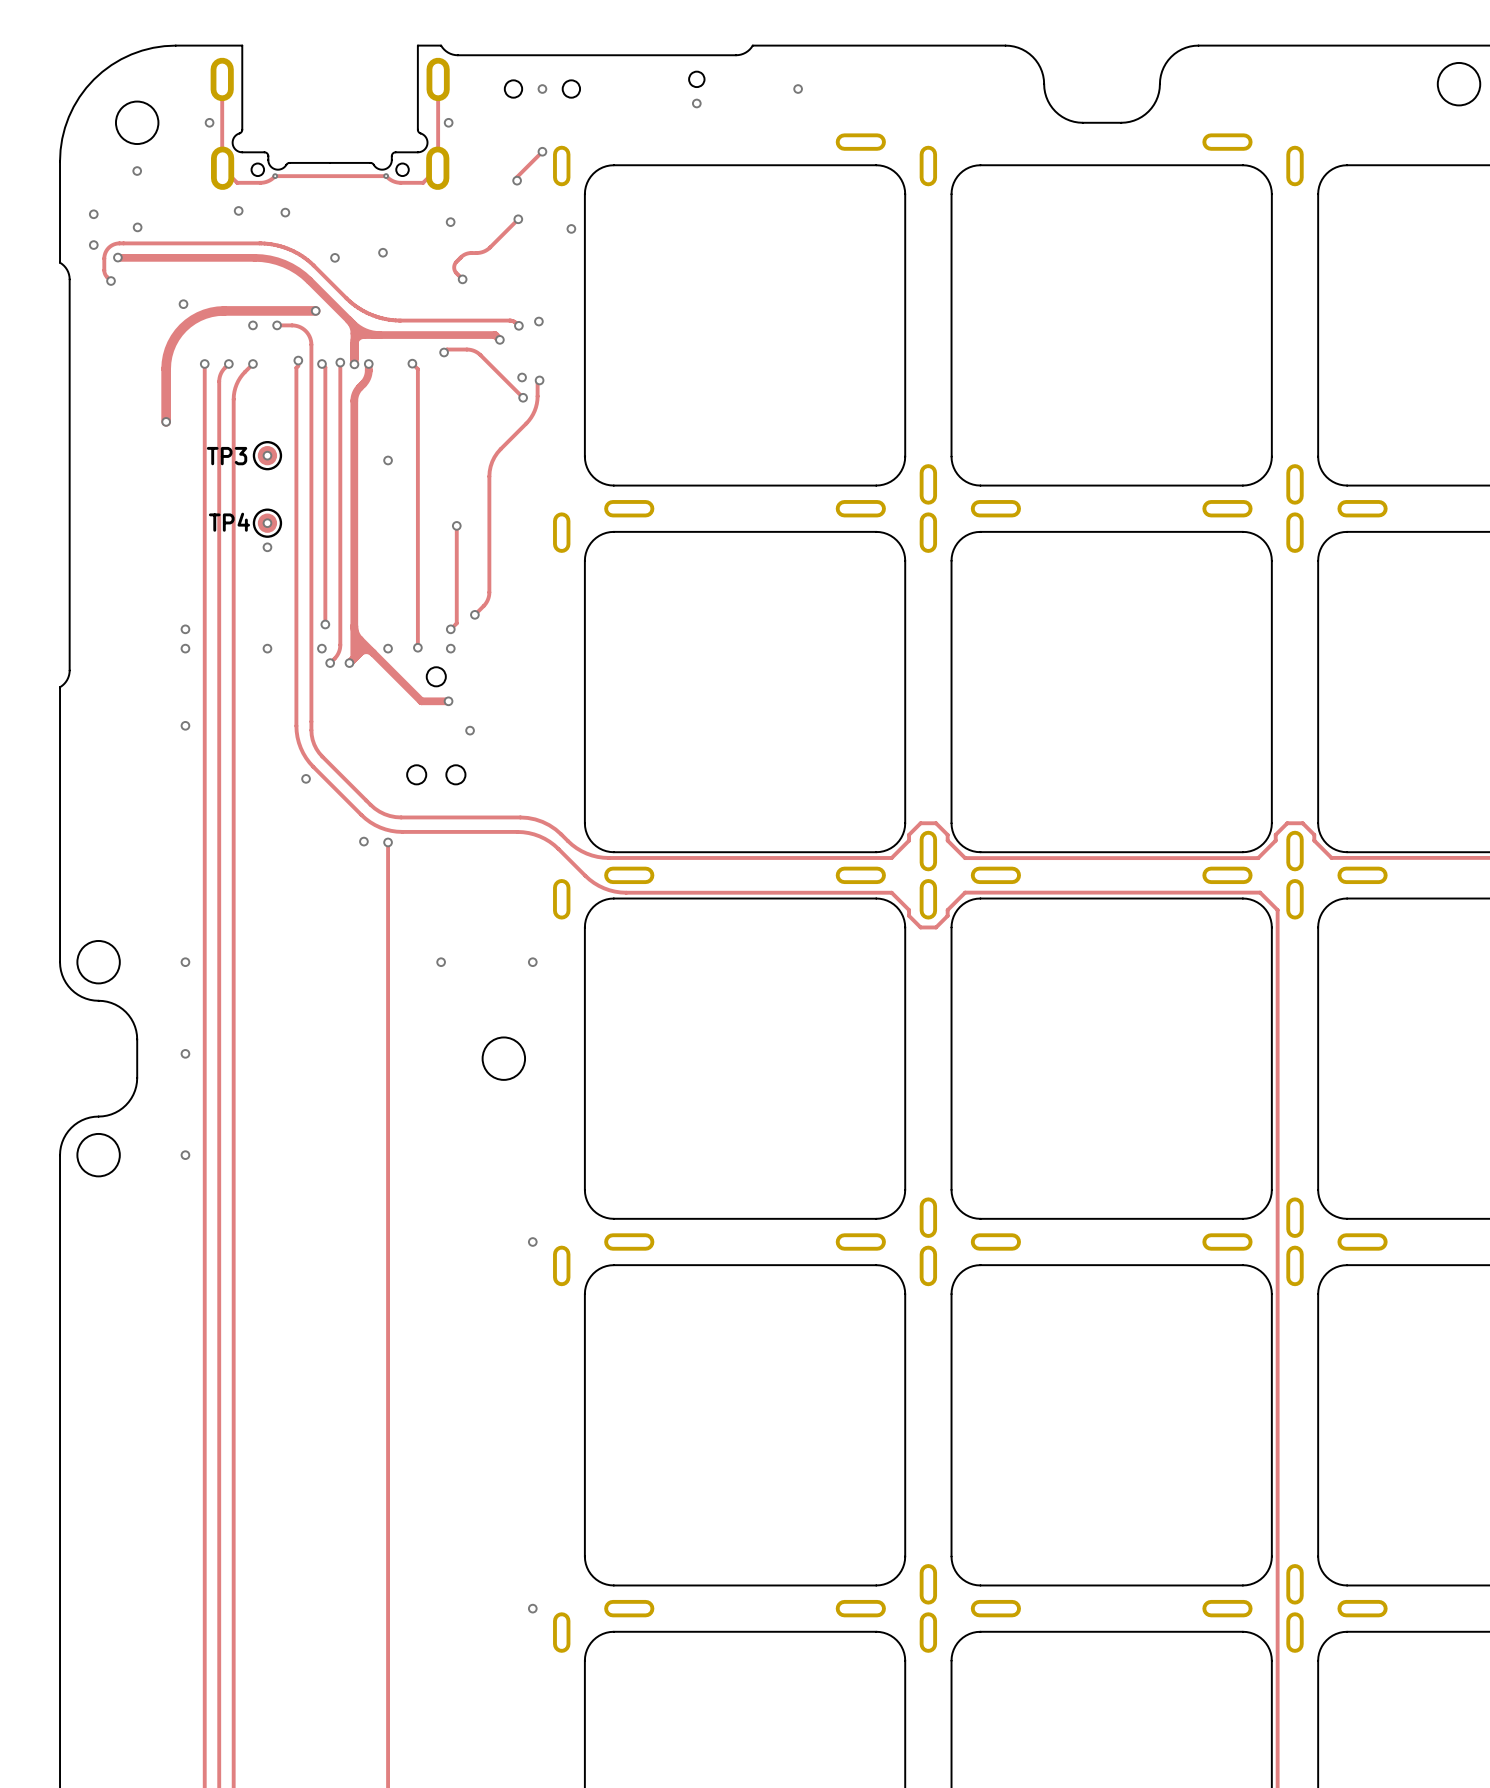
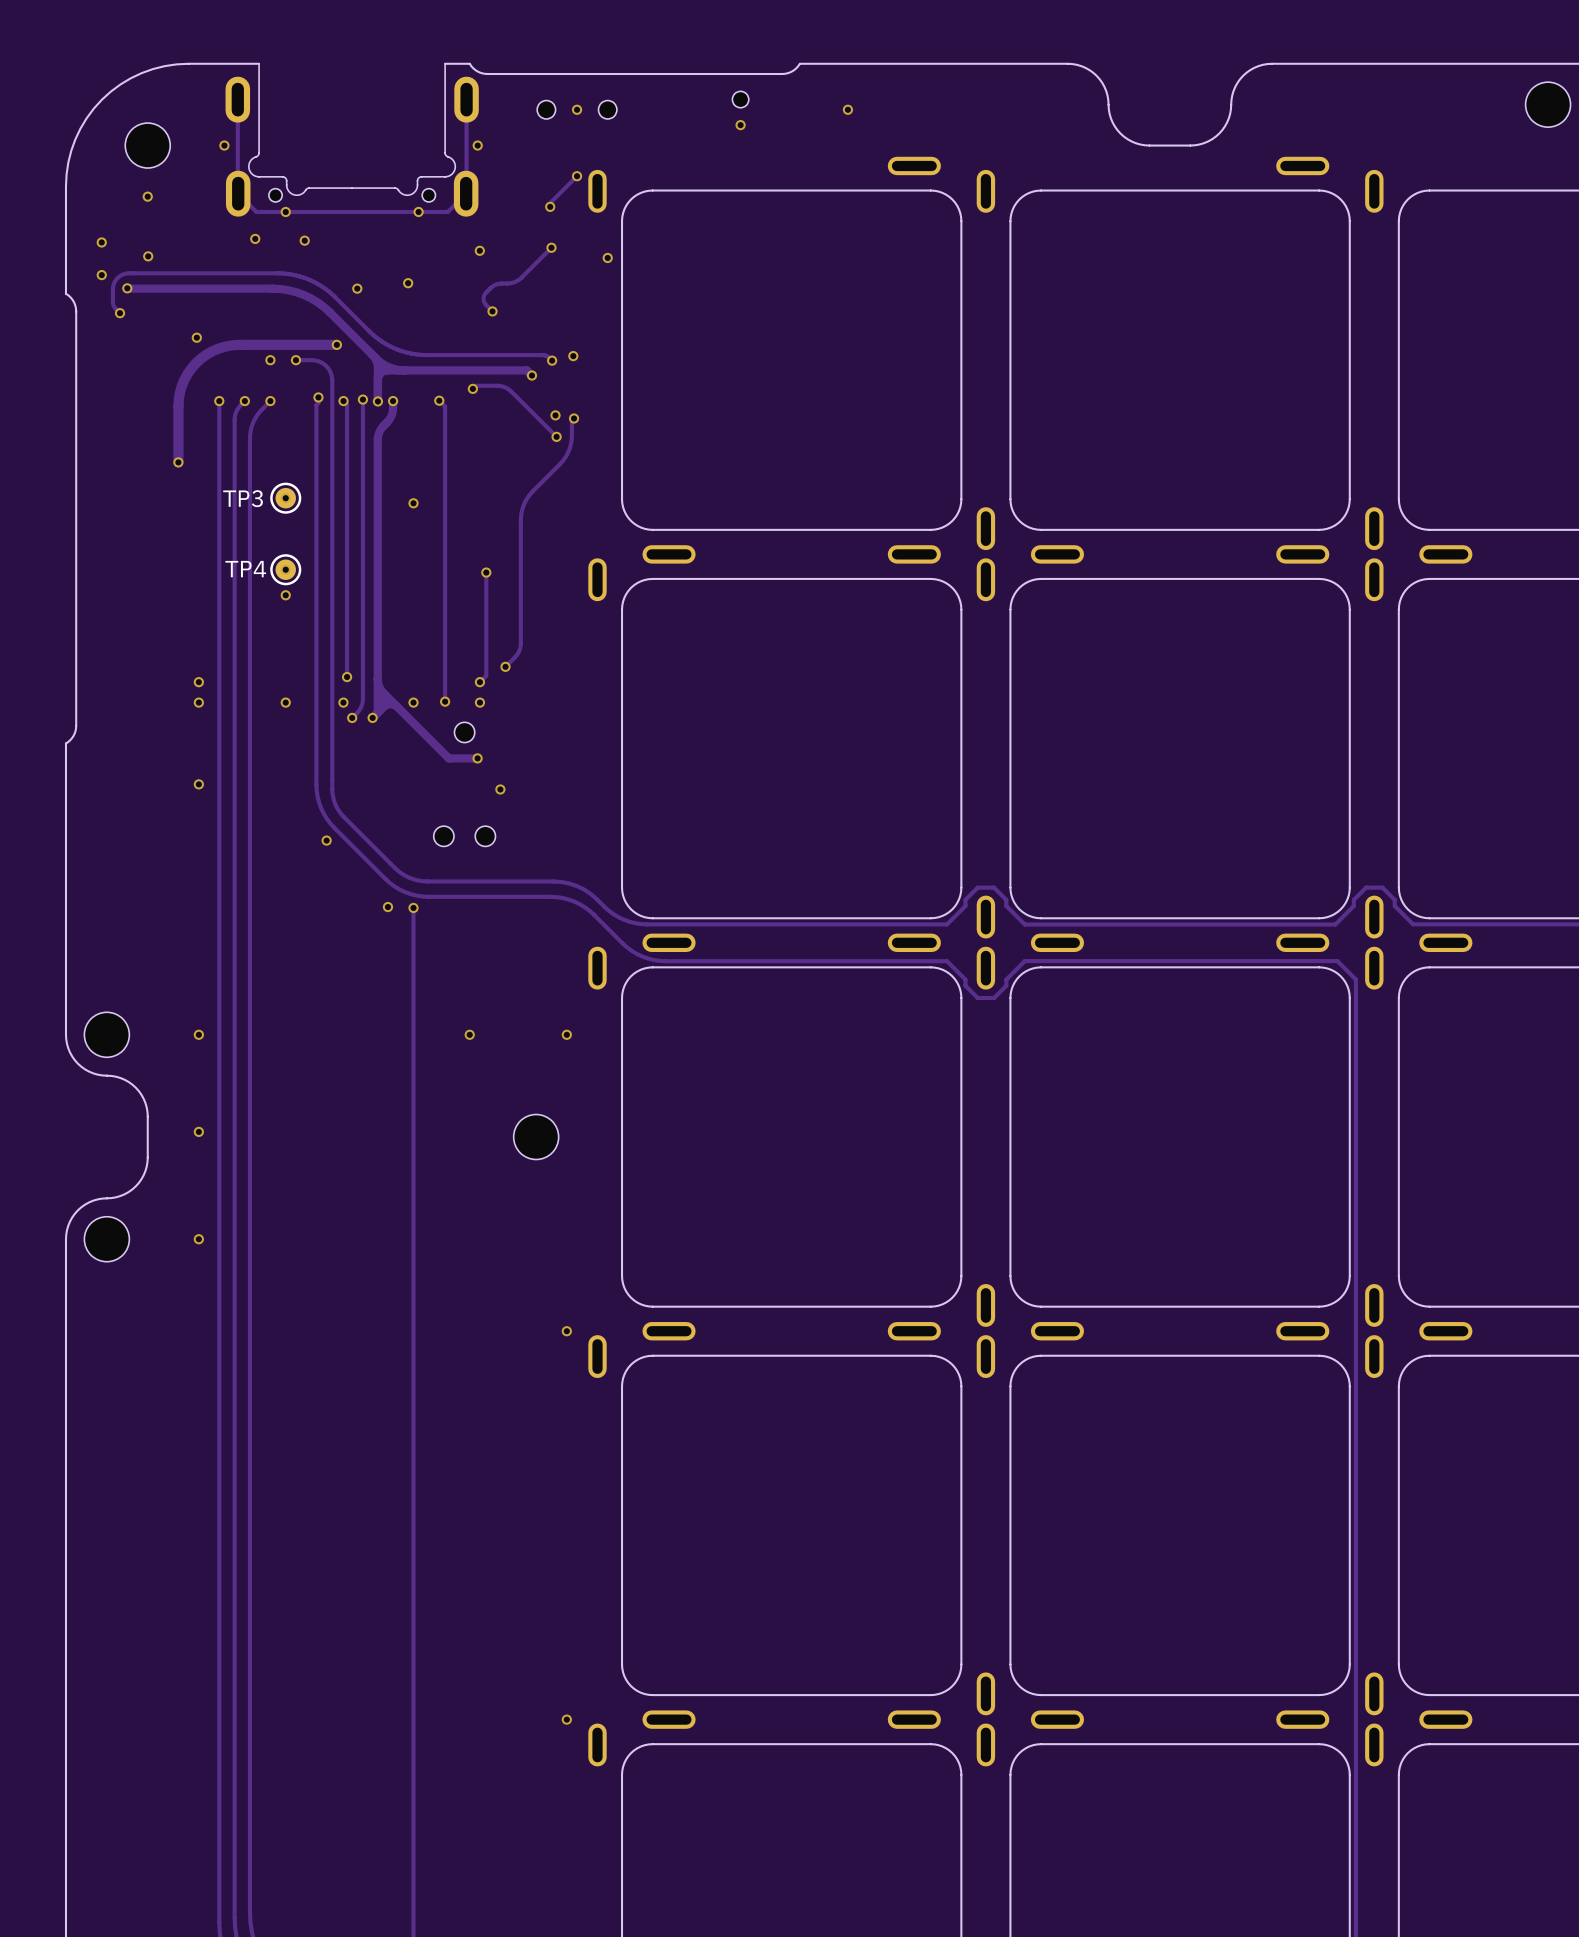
via: (275, 176) -> none
track: (386, 176) (275, 176) (264, 182) (237, 182) -> (450, 209) (447, 211) (256, 211) (253, 209)
track: (386, 176) (397, 182) (423, 182) -> none
via: (386, 176) -> none
via: none -> (285, 211)
via: none -> (418, 211)

